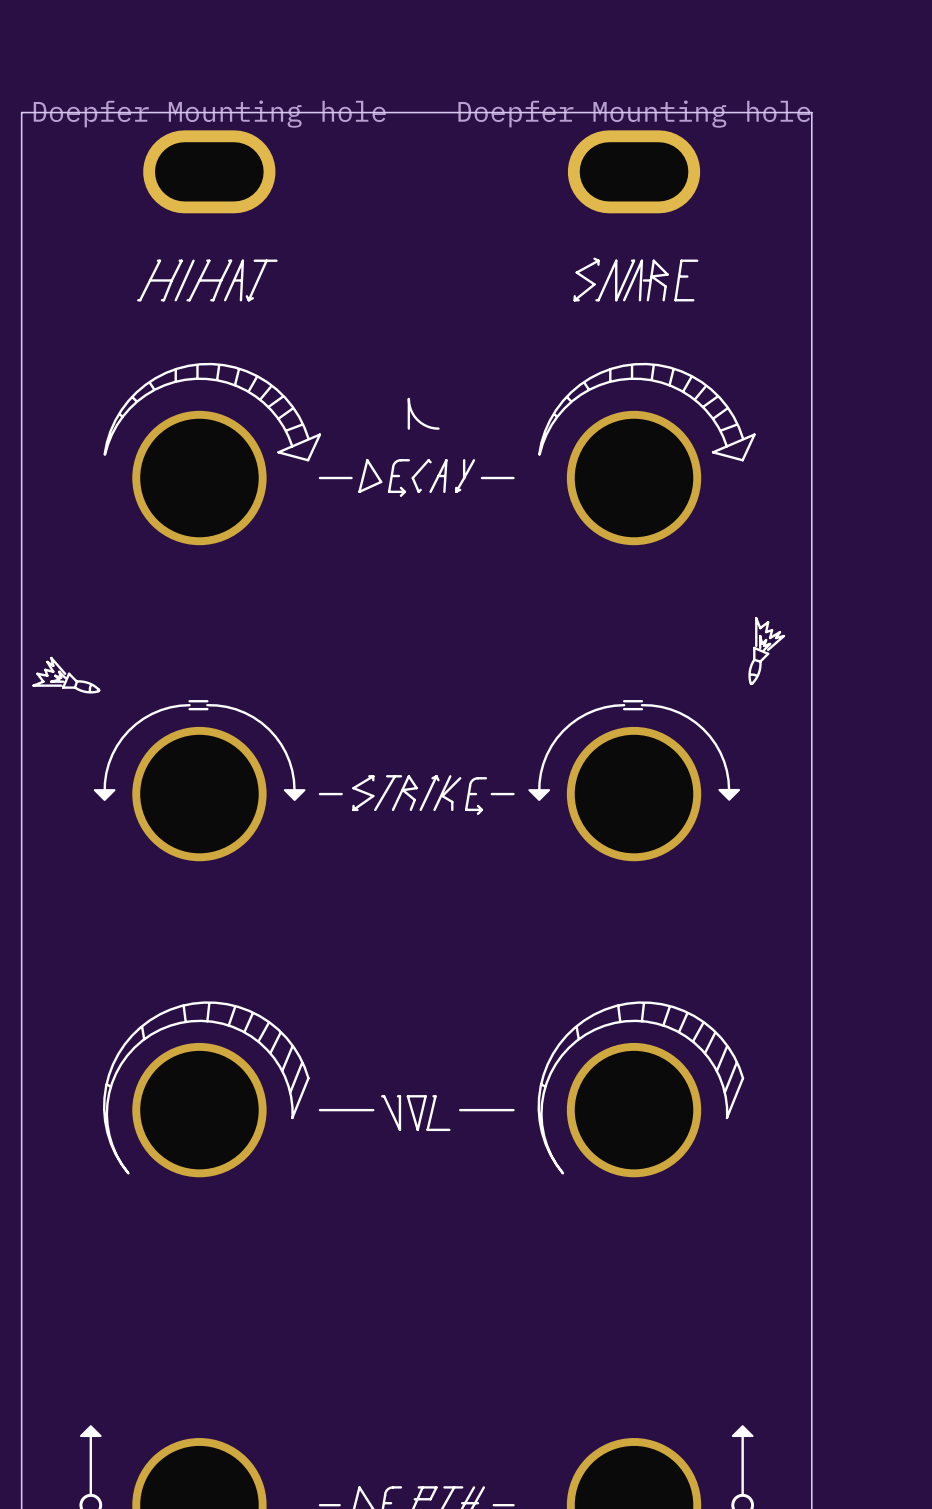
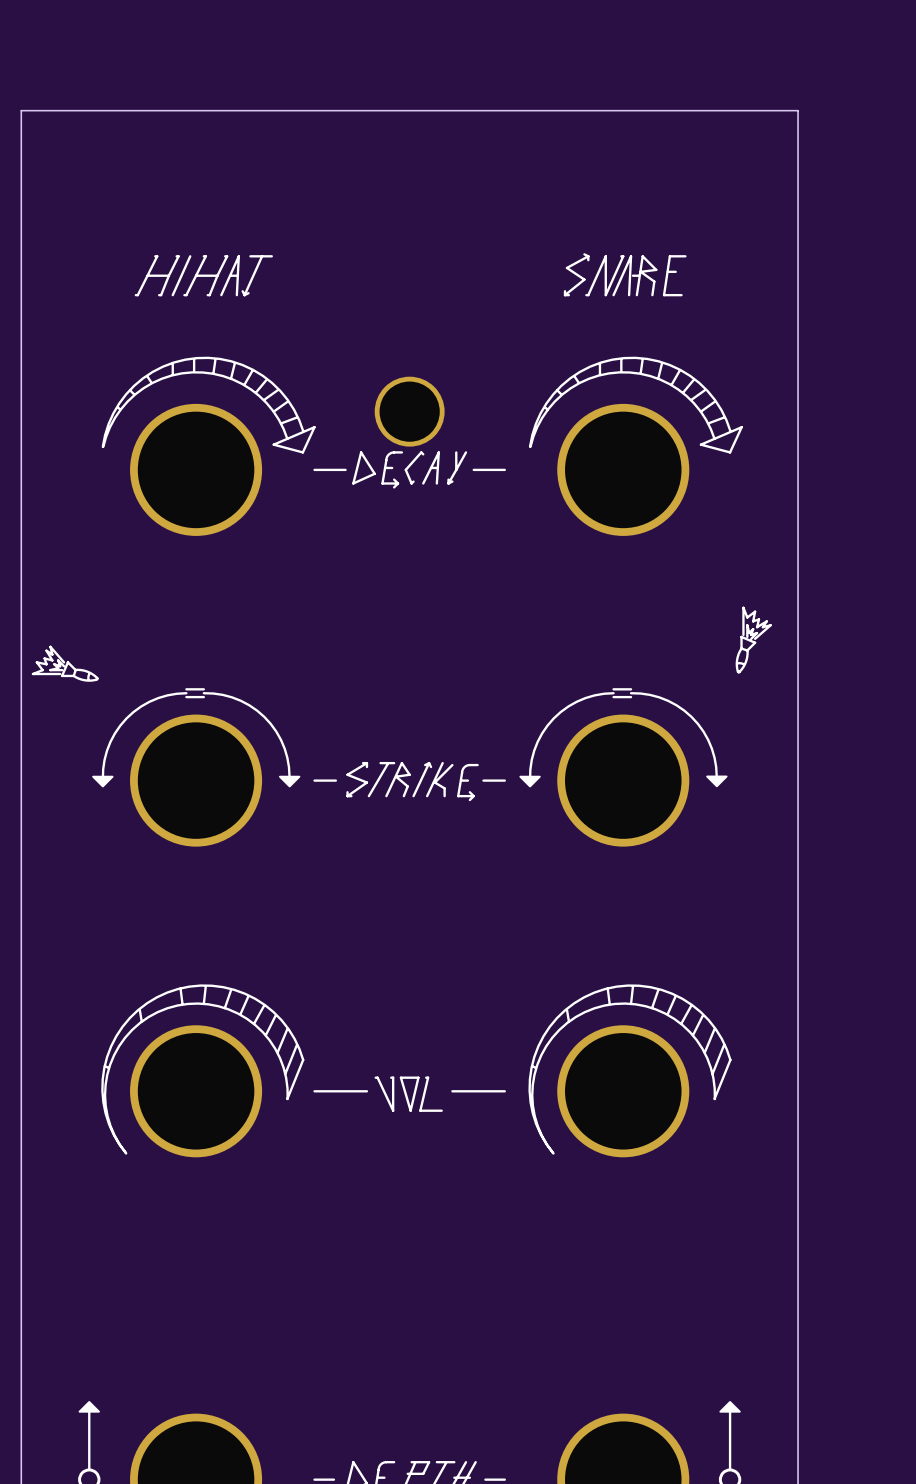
part: Doepfer Mounting hole (209, 171) -> none
part: Doepfer Mounting hole (634, 171) -> none
via: none -> (409, 411)
line: (408, 428) (408, 399) (411, 410) (417, 419) (427, 426) (438, 428) -> none

